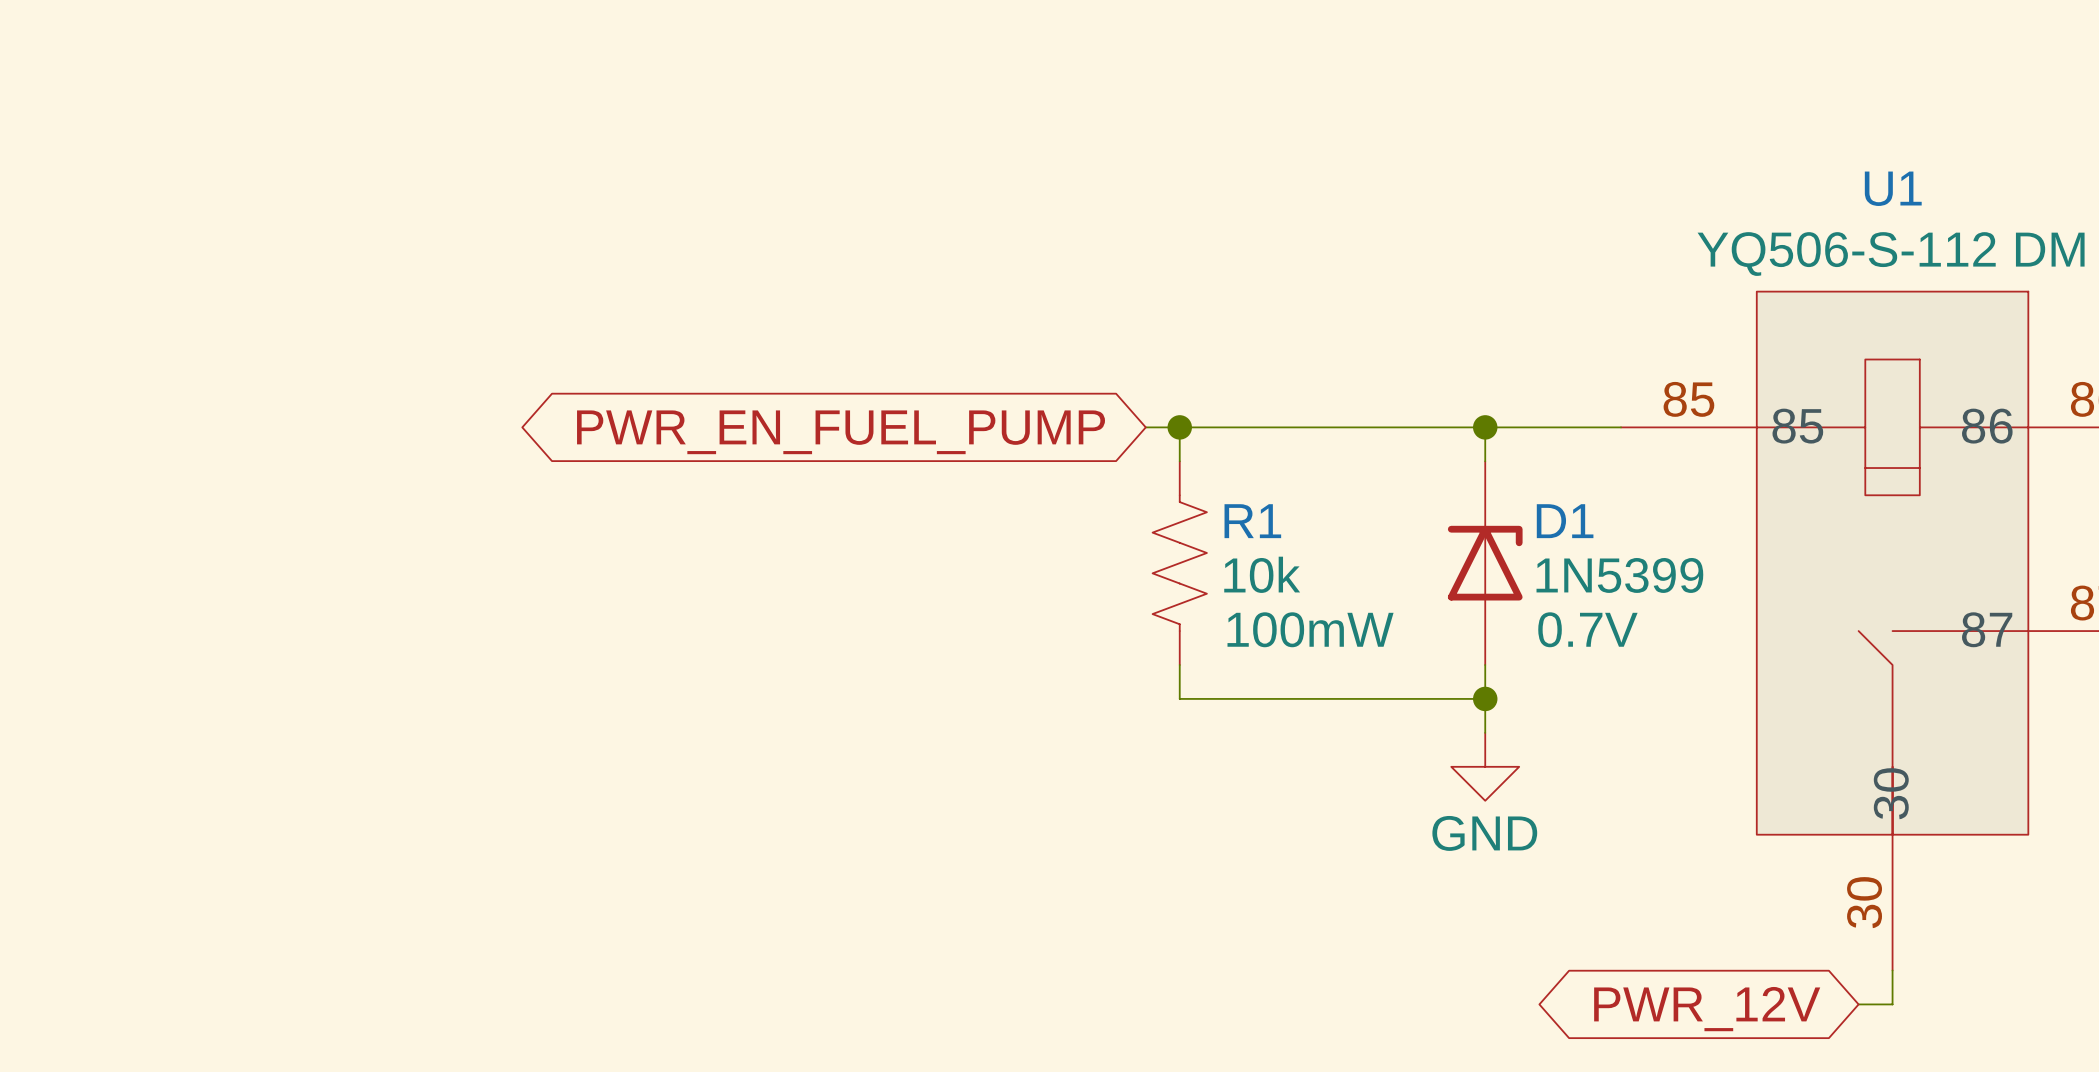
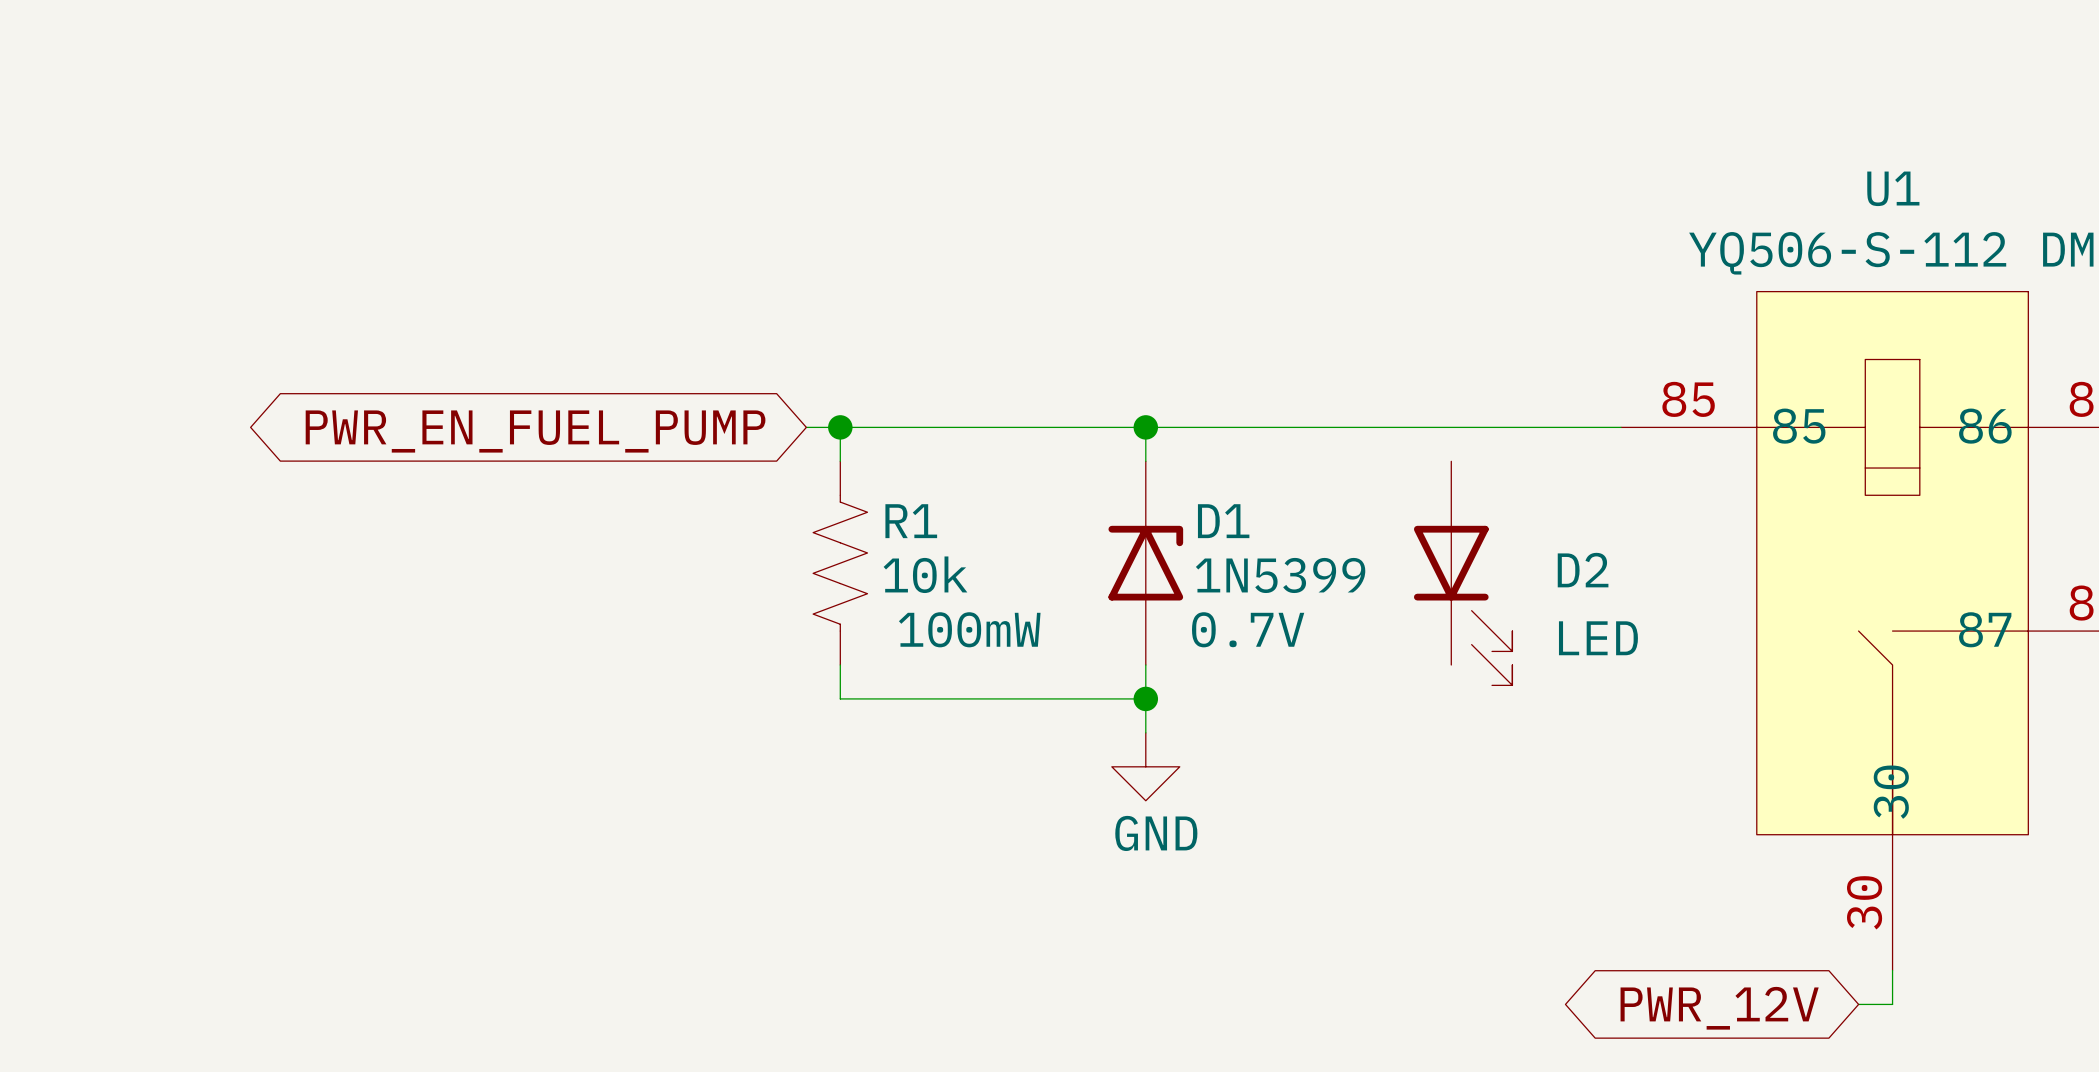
wire: none -> (806, 427) (1145, 427) (1145, 461)
junction: none -> (840, 427)
wire: (1179, 427) (1179, 461) -> (840, 427) (840, 461)
junction position: (1179, 427) -> (1145, 427)
wire: (1485, 427) (1485, 461) -> none
junction: (1485, 427) -> none
global label position: PWR_EN_FUEL_PUMP (841, 432) -> PWR_EN_FUEL_PUMP (535, 431)
R1 position: (1179, 563) -> (840, 563)
D1 position: (1485, 563) -> (1145, 563)
D2: none -> LED (1463, 573)
wire: (1179, 664) (1179, 698) (1485, 698) -> (840, 664) (840, 698) (1145, 698)
wire: (1485, 664) (1485, 732) -> (1145, 664) (1145, 732)
junction: none -> (1145, 698)
junction: (1485, 698) -> none
power symbol position: GND (1485, 766) -> GND (1145, 766)

